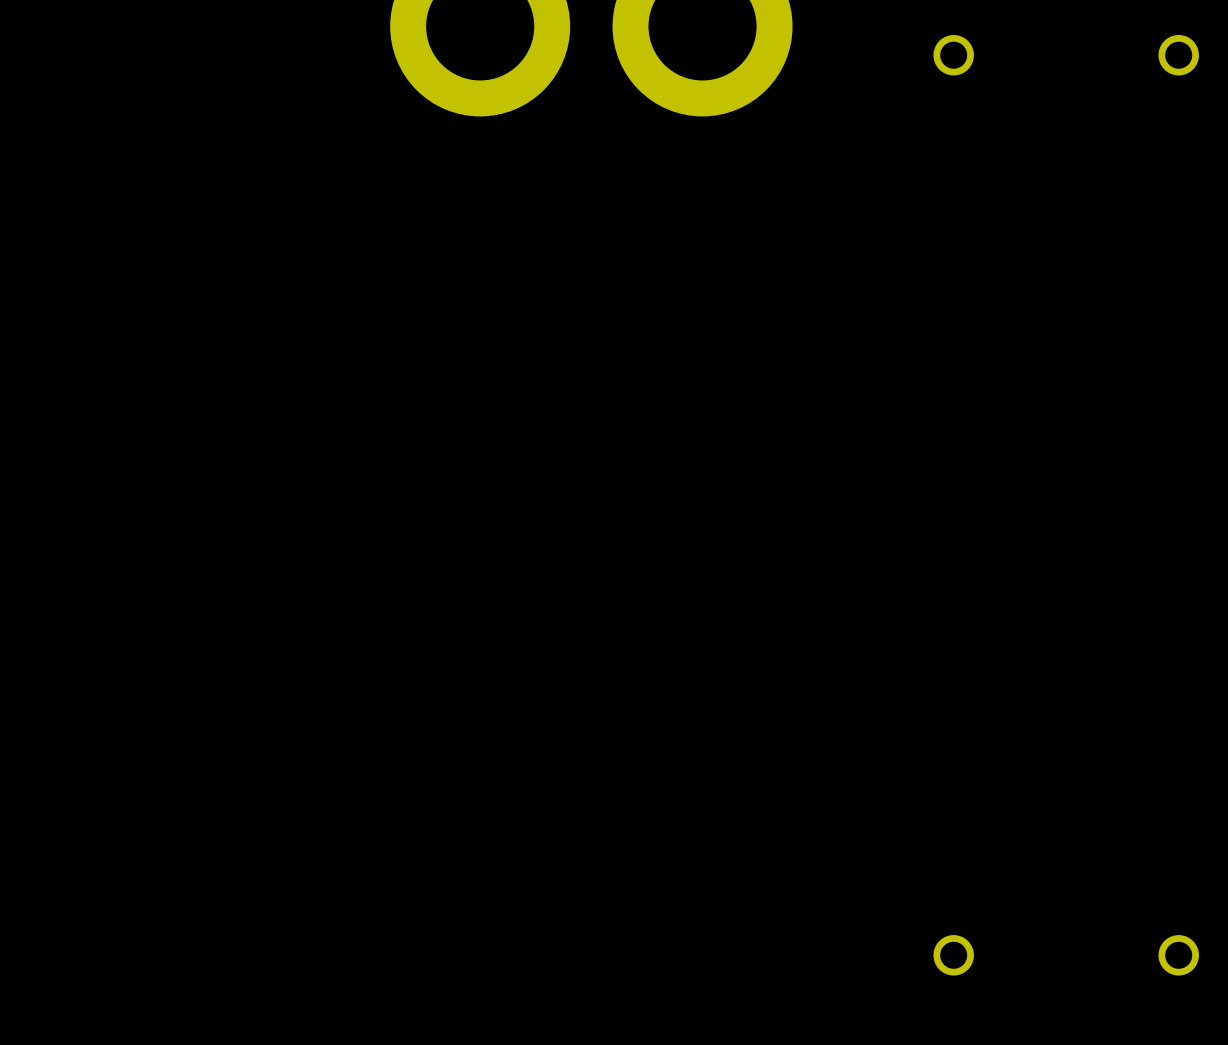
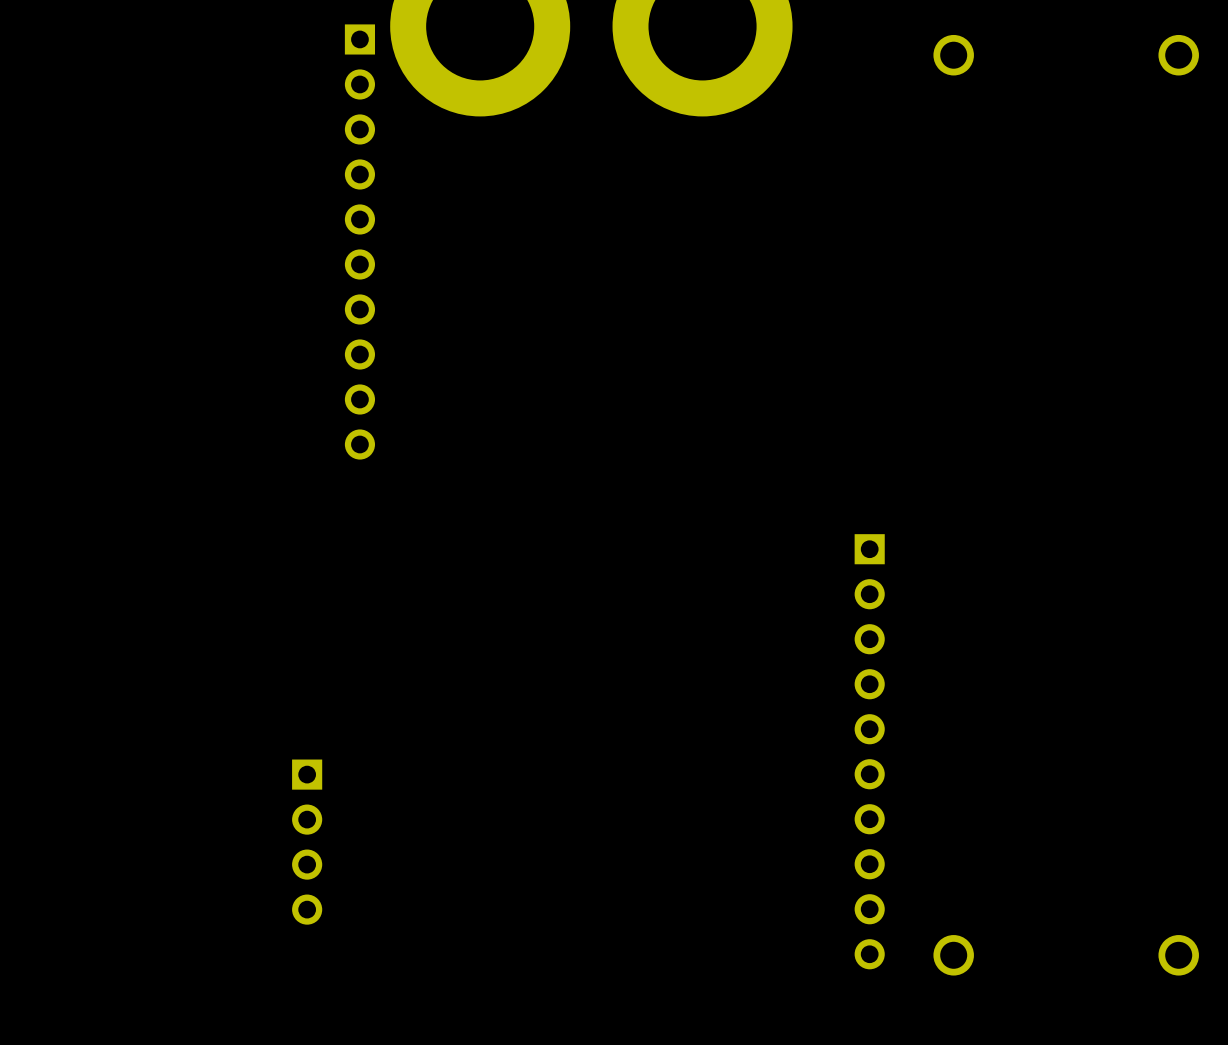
part: none -> (359, 241)
part: none -> (869, 751)
part: none -> (307, 842)

